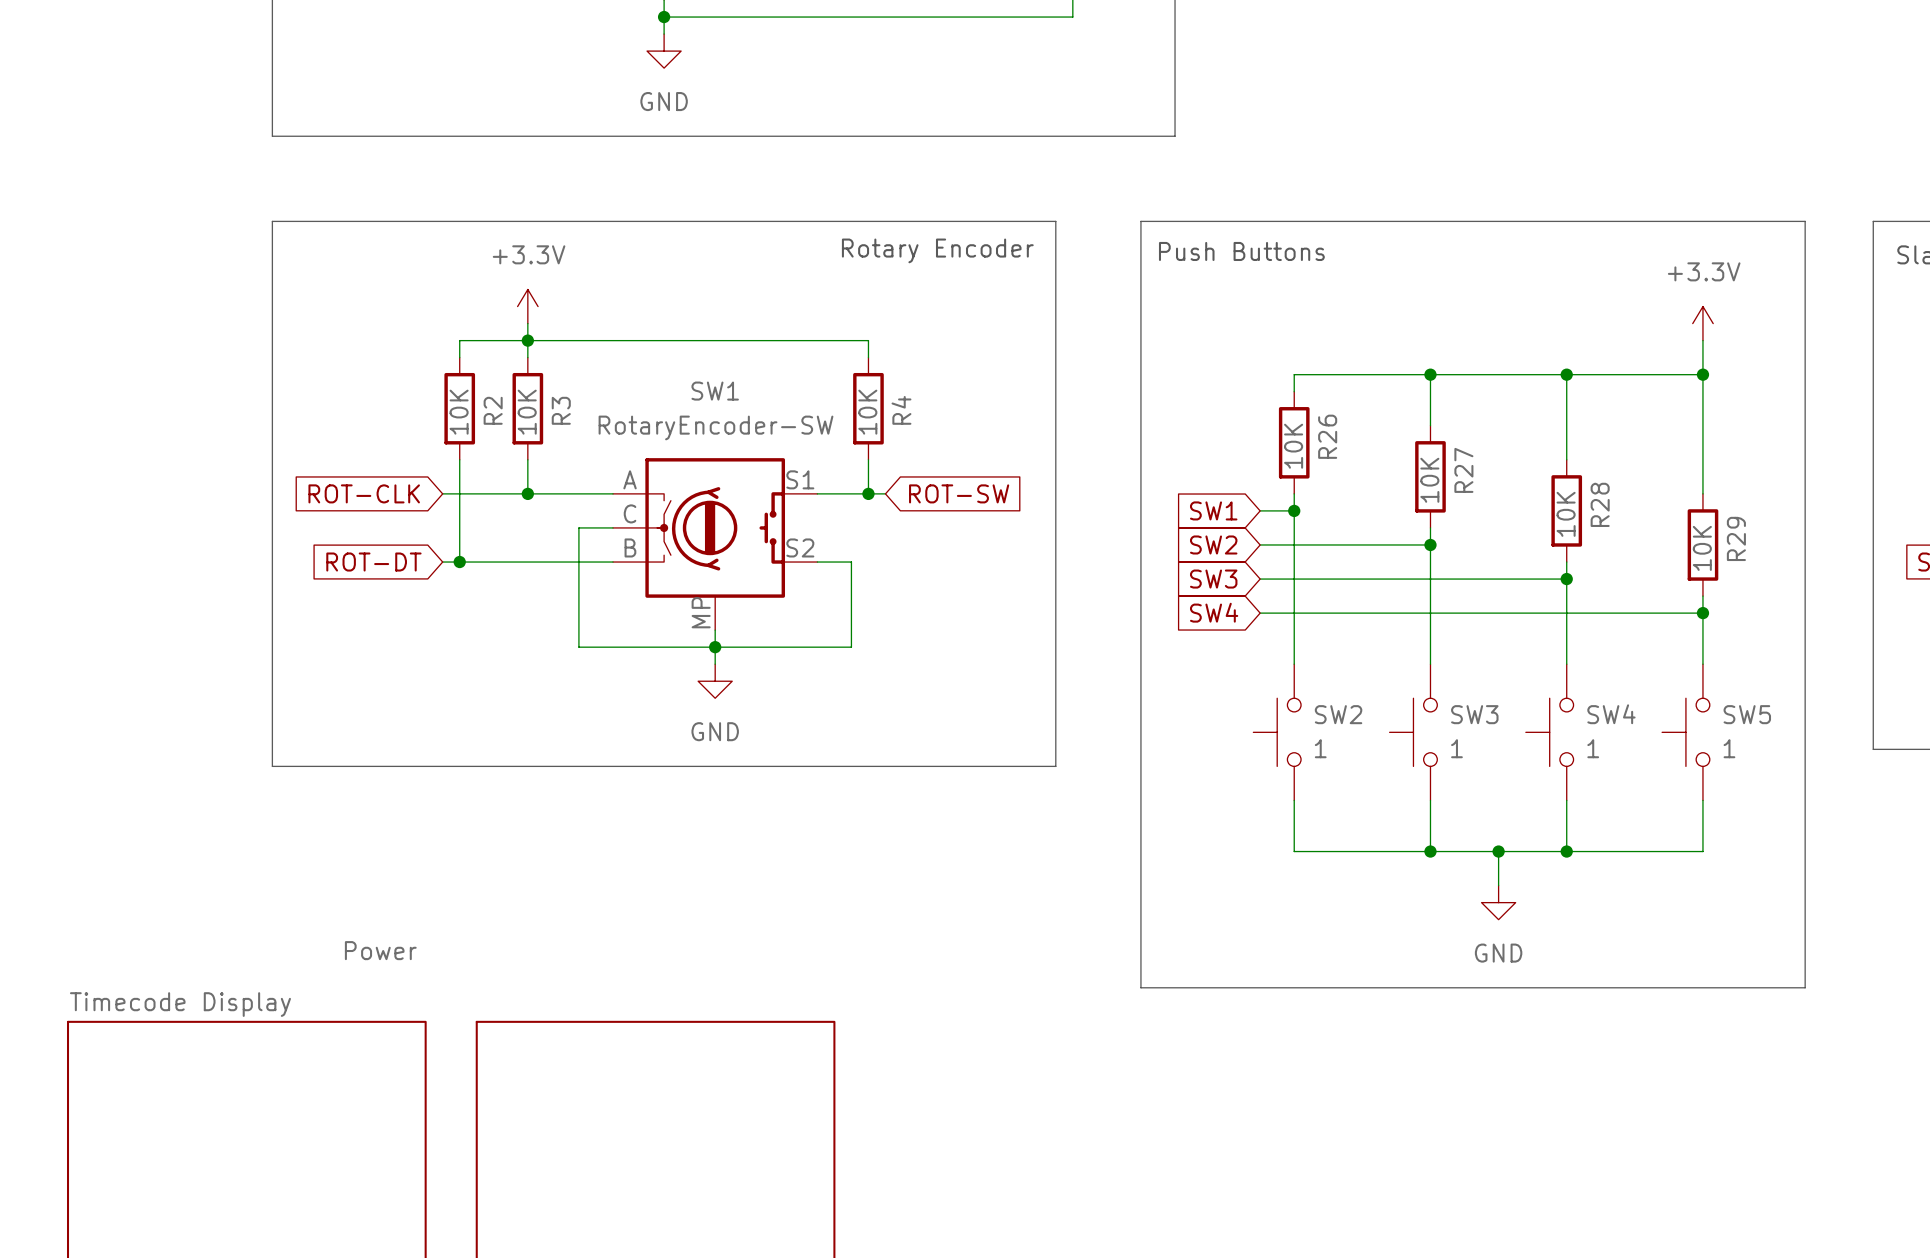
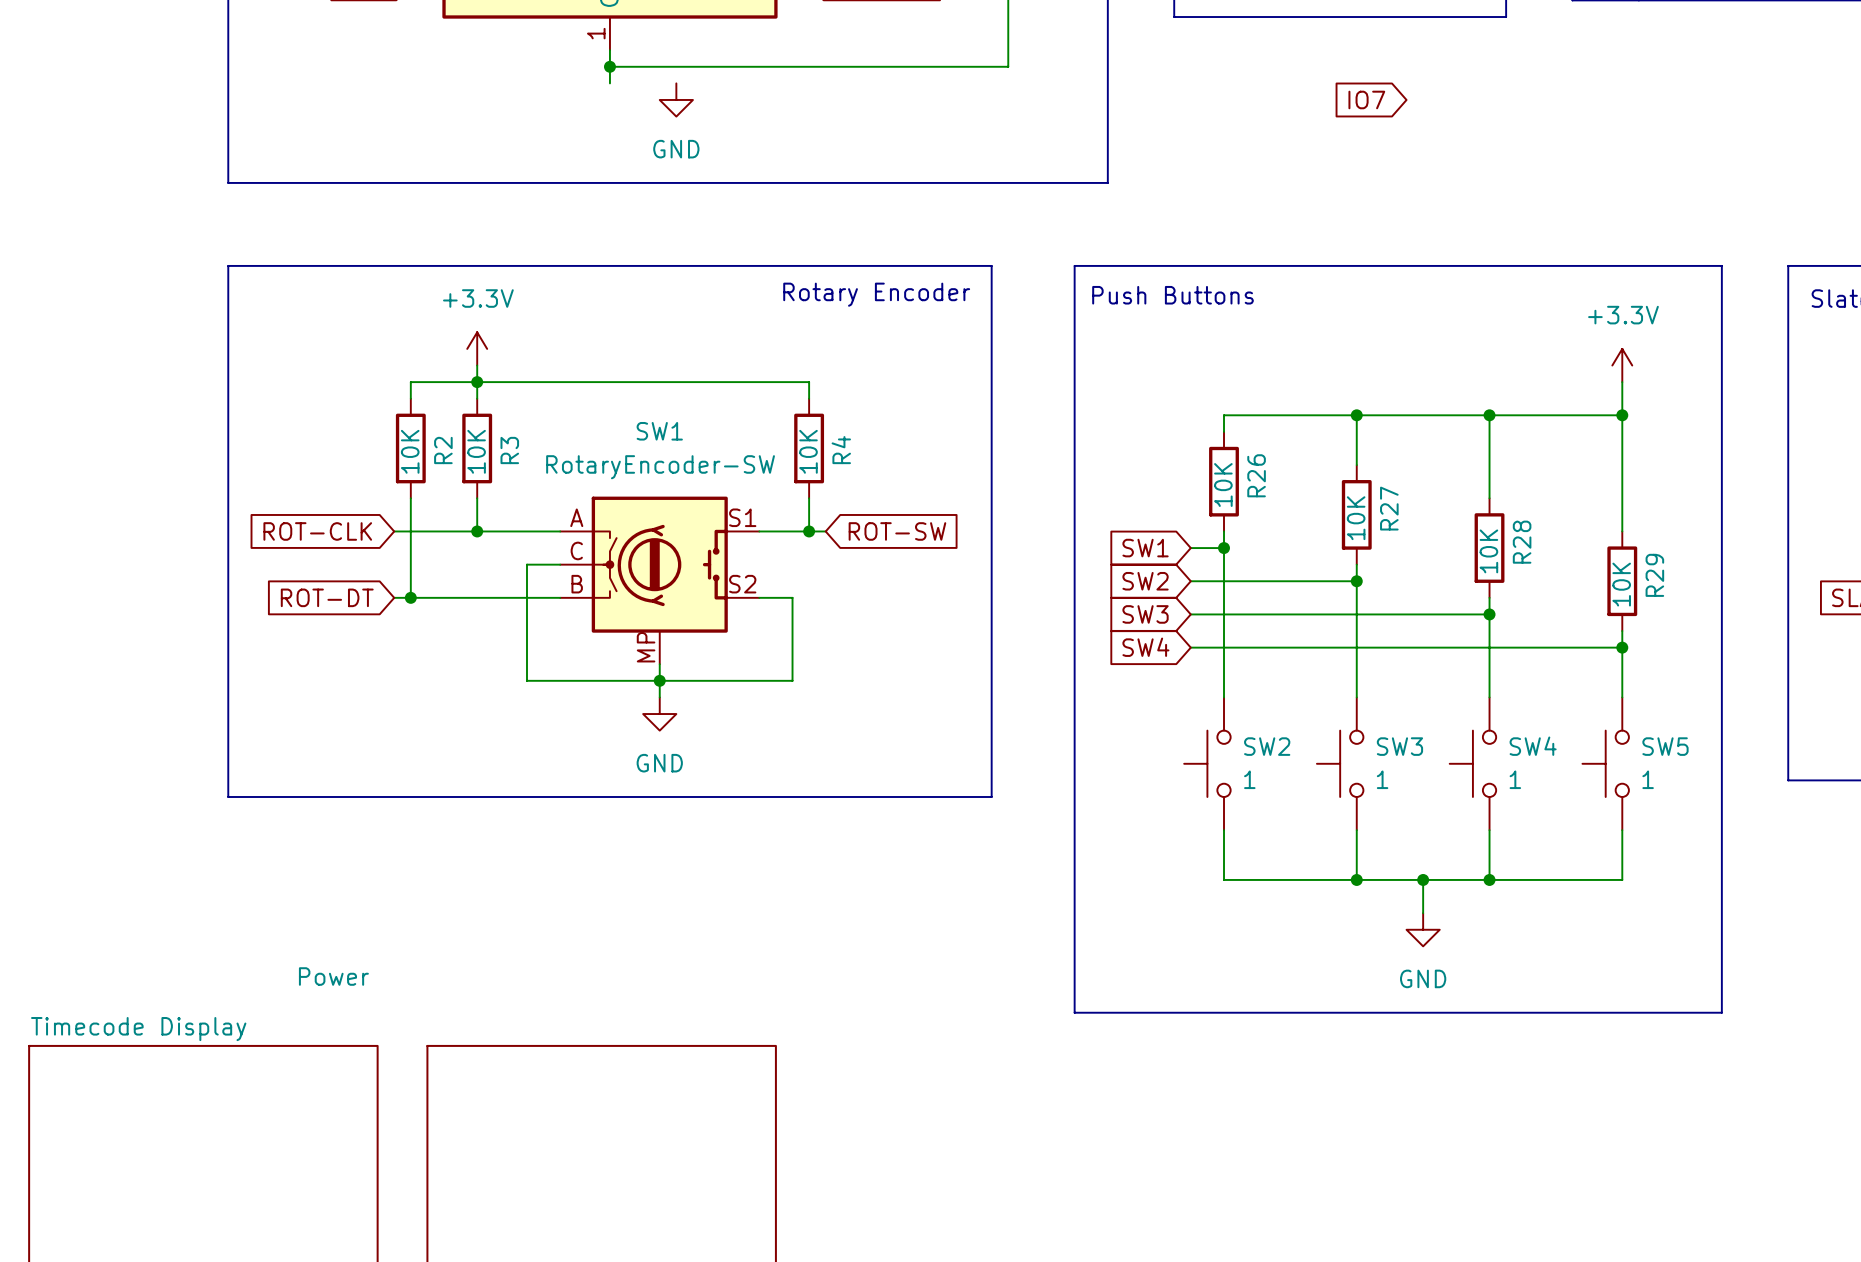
power symbol position: GND (664, 51) -> GND (676, 99)
global label: none -> IO7 (1366, 99)

